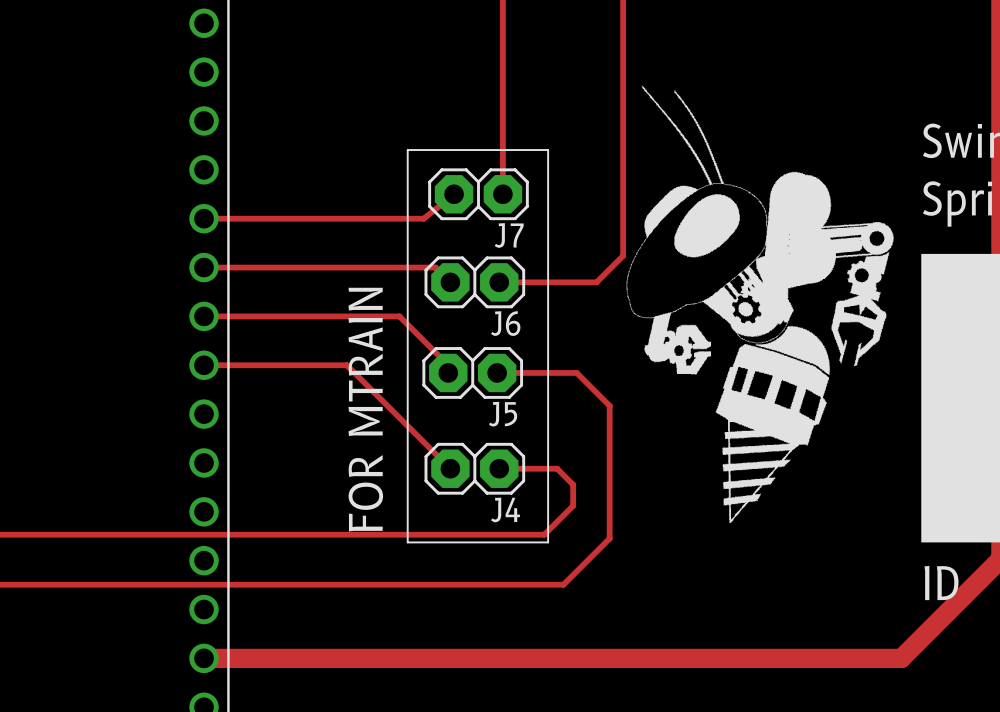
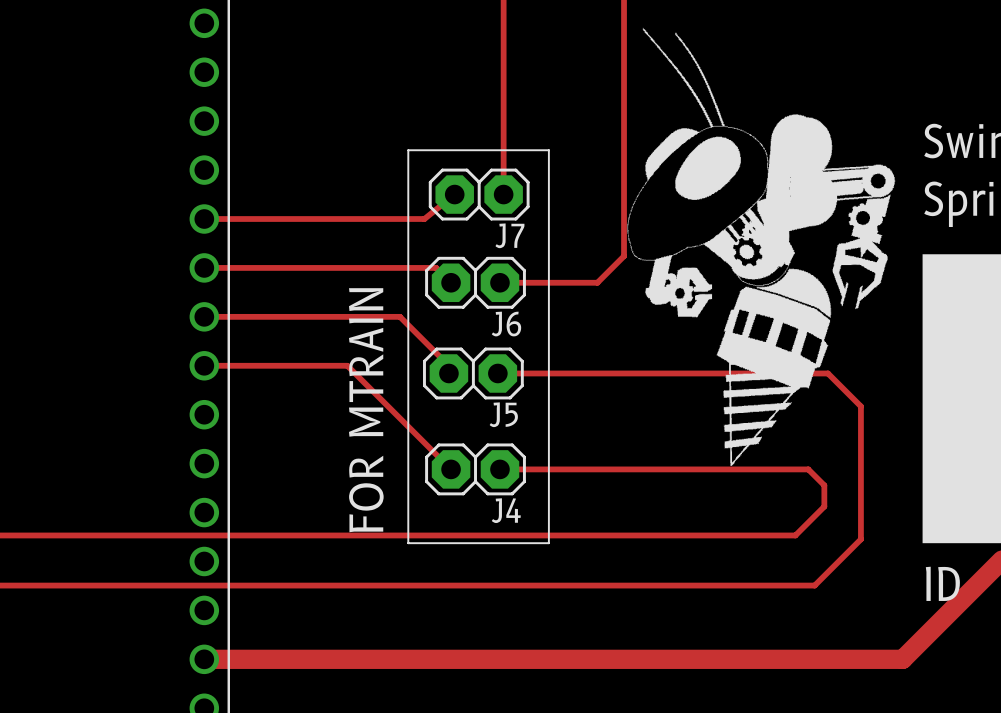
drawing position: (760, 304) -> (761, 246)
top track: (576, 372) (609, 405) (609, 538) (563, 584) -> (577, 373) (828, 373) (860, 406) (860, 539) (814, 585) (564, 585)
top track: (557, 468) (573, 484) (573, 505) (544, 534) -> (557, 469) (808, 469) (824, 485) (824, 506) (795, 535) (545, 535)

